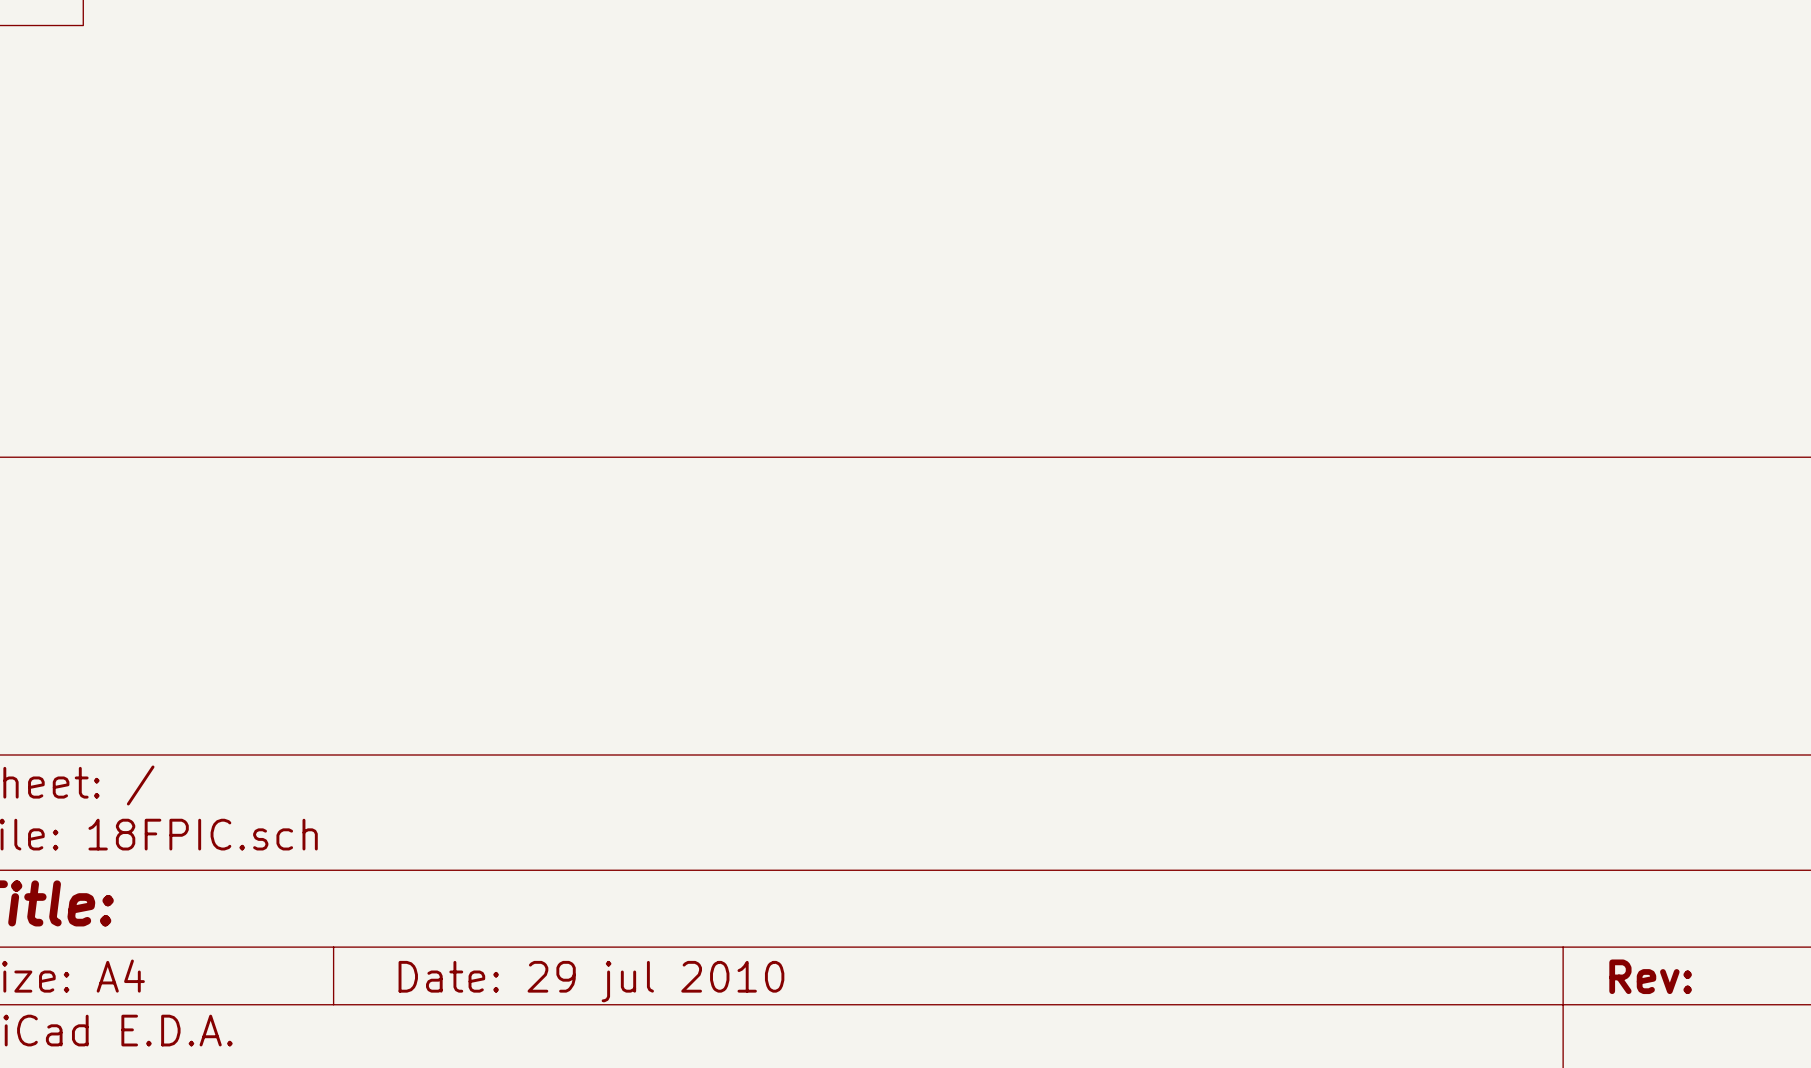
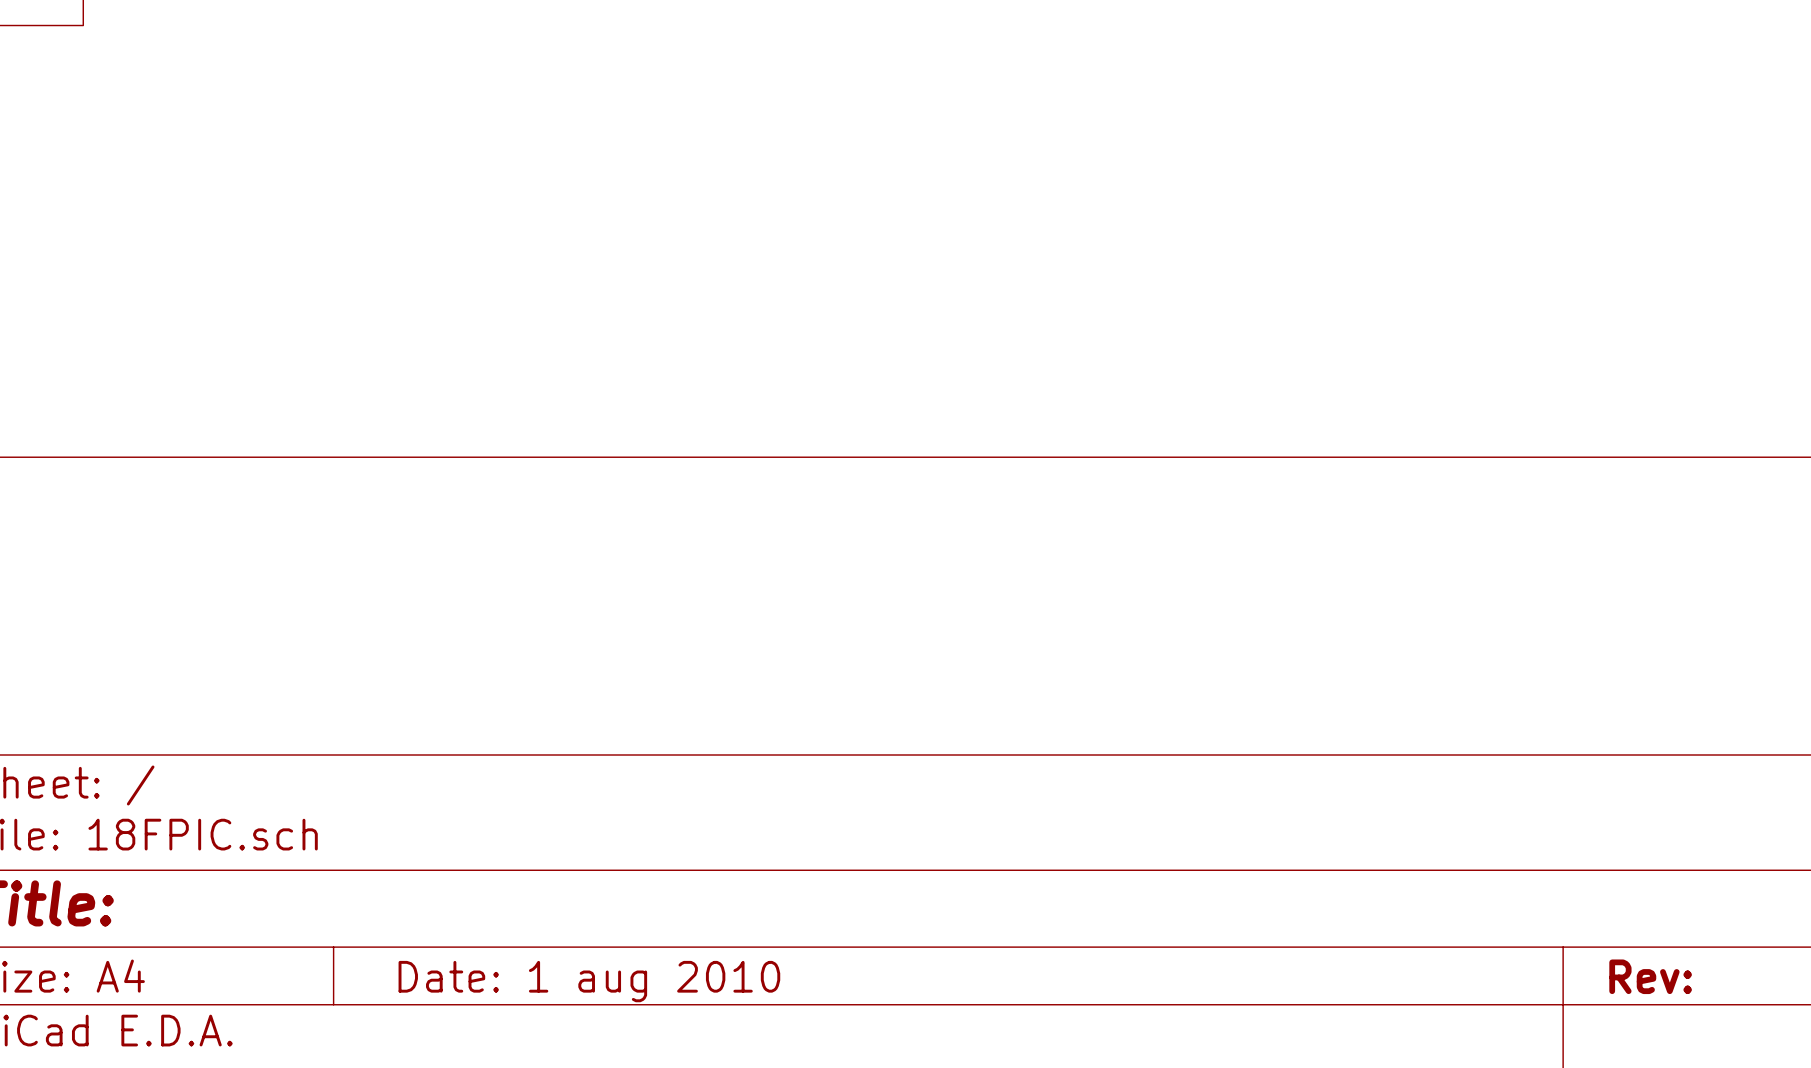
title block: Date: 29 jul 2010 (591, 981) -> Date: 1 aug 2010 (589, 981)

